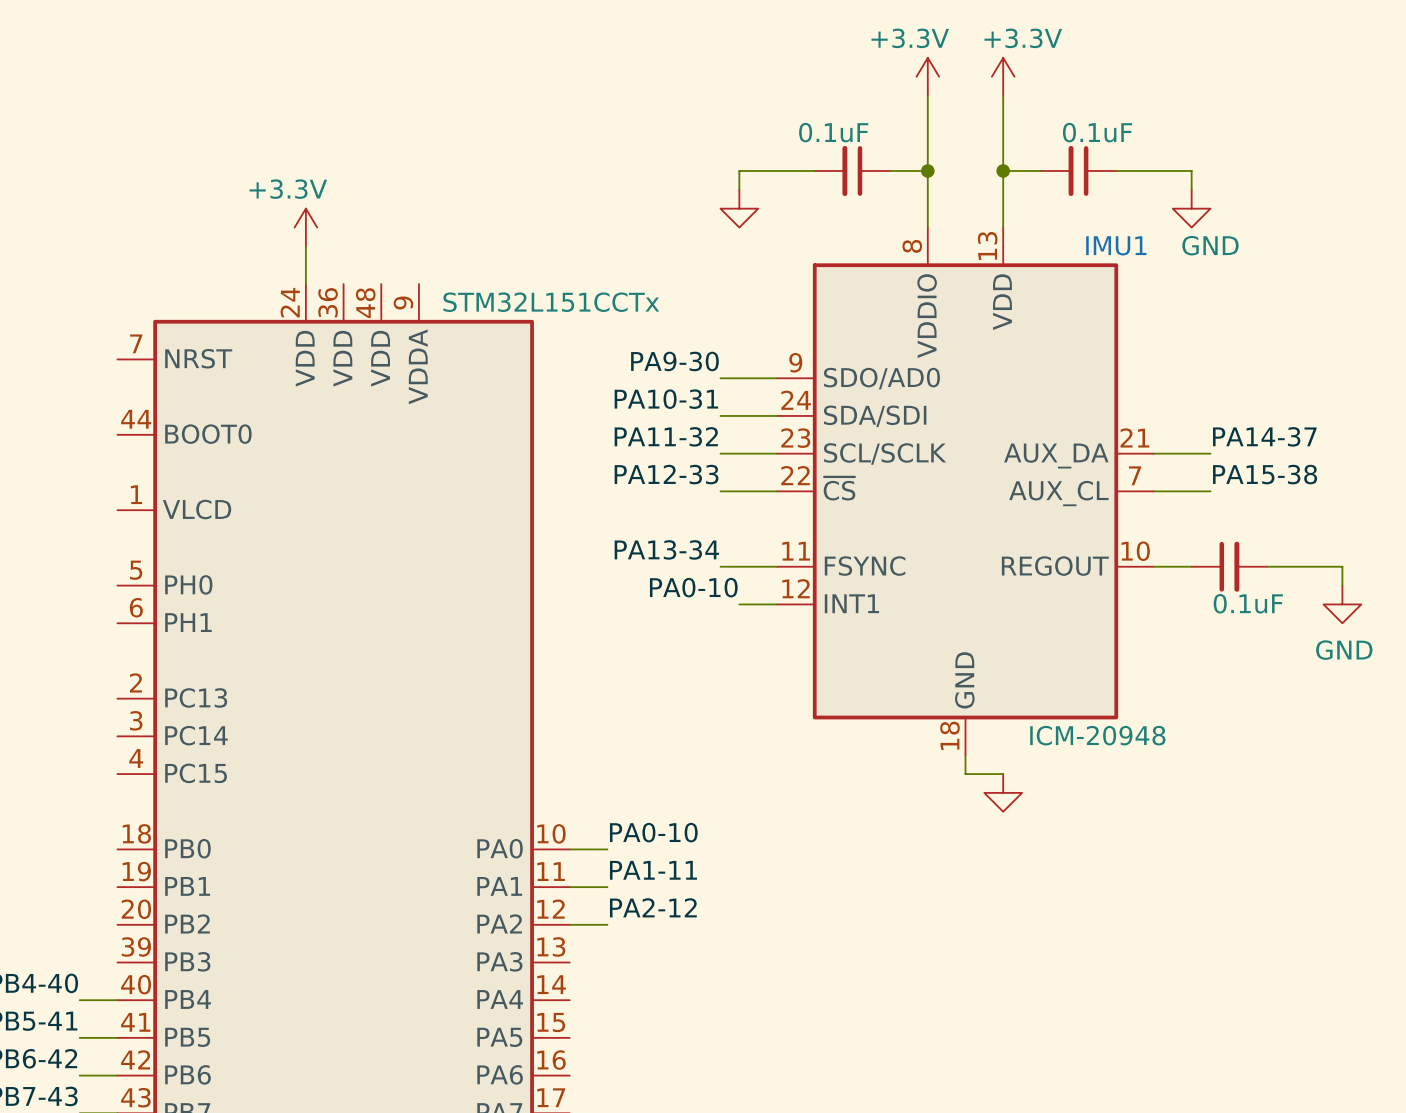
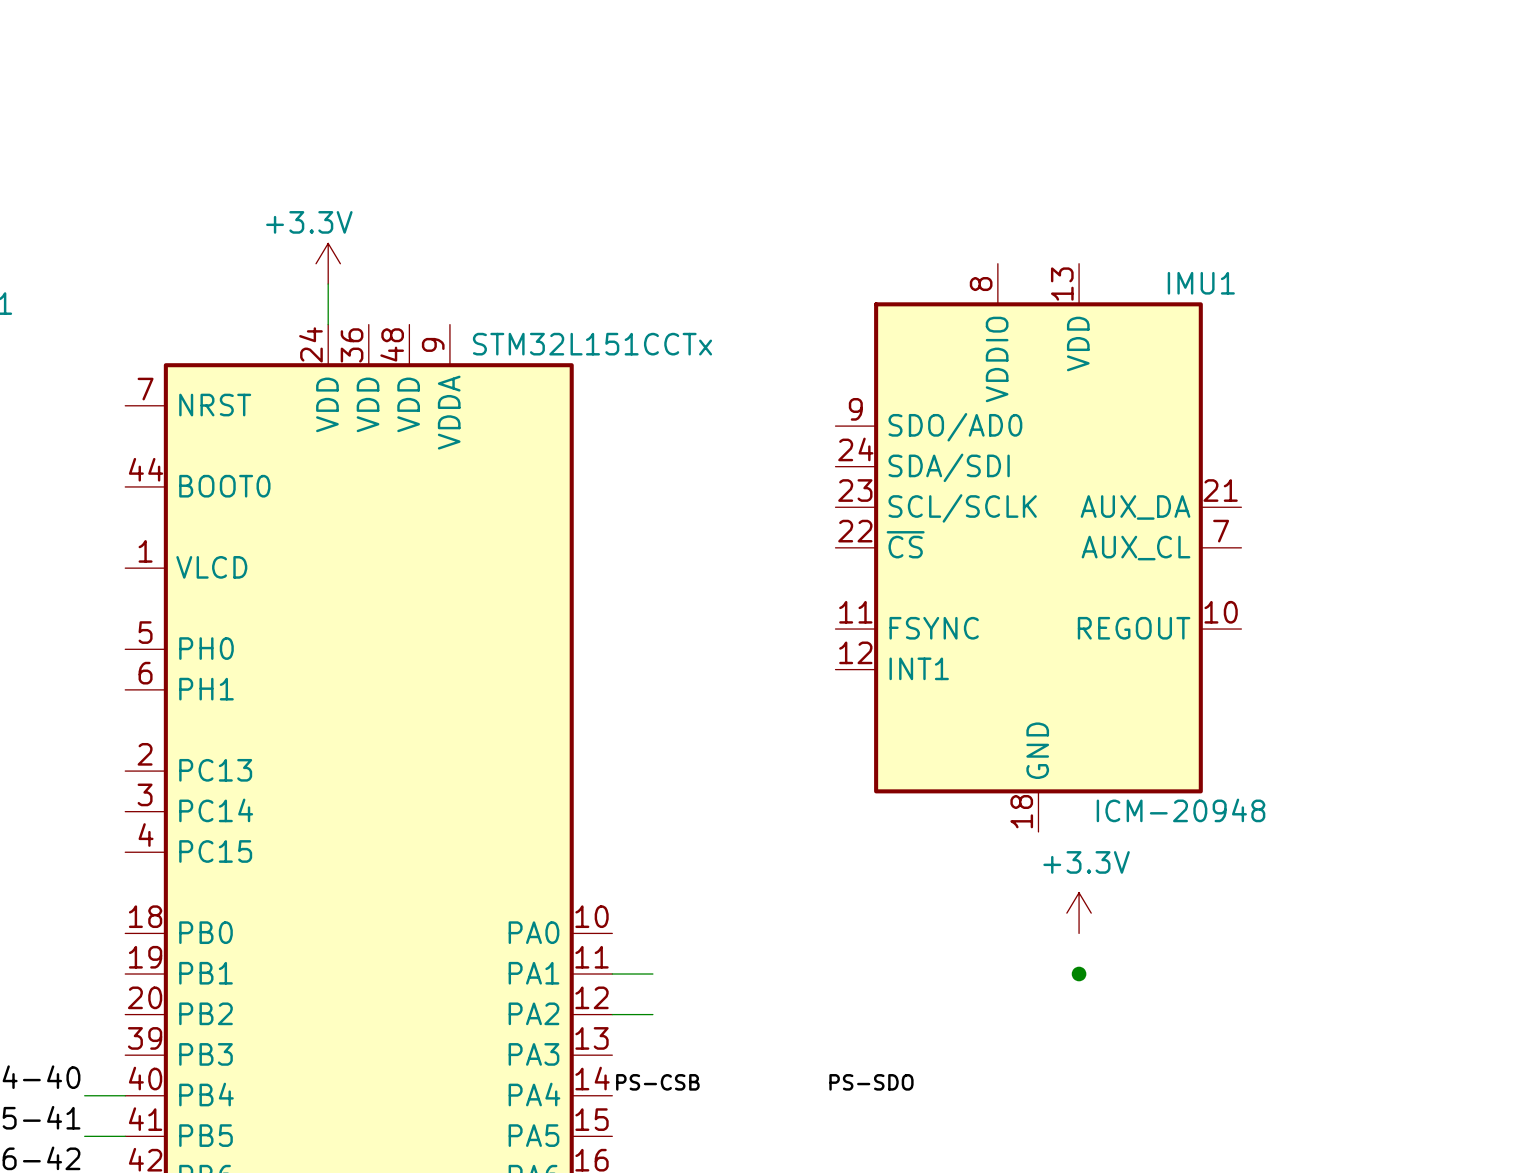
power symbol: +3.3V (927, 76) -> none
power symbol: +3.3V (1003, 76) -> none
wire: (927, 95) (927, 227) -> none
wire: (1003, 95) (1003, 227) -> none
wire: (814, 170) (739, 170) (739, 189) -> none
part: 0.1uF (852, 170) -> none
wire: (890, 170) (927, 170) -> none
junction: (927, 170) -> none
wire: (1003, 170) (1040, 170) -> none
junction: (1003, 170) -> none
part: 0.1uF (1078, 170) -> none
wire: (1116, 170) (1191, 170) (1191, 189) -> none
power symbol: (739, 208) -> none
power symbol: GND (1191, 208) -> none
label: PA9-30 (674, 361) -> none
wire: (720, 378) (777, 378) -> none
label: PA10-31 (666, 399) -> none
wire: (720, 415) (777, 415) -> none
label: PA11-32 (666, 436) -> none
label: PA14-37 (1264, 436) -> none
wire: (720, 453) (777, 453) -> none
wire: (1153, 453) (1210, 453) -> none
label: PA12-33 (666, 474) -> none
label: PA15-38 (1265, 474) -> none
wire: (720, 491) (777, 491) -> none
wire: (1153, 491) (1210, 491) -> none
label: PA13-34 (666, 549) -> none
wire: (720, 566) (777, 566) -> none
wire: (1153, 566) (1191, 566) -> none
part: 0.1uF (1229, 566) -> none
wire: (1267, 566) (1342, 566) (1342, 585) -> none
label: PA0-10 (693, 587) -> none
wire: (739, 604) (777, 604) -> none
power symbol: GND (1342, 604) -> none
wire: (965, 755) (965, 774) (1003, 774) -> none
power symbol: (1003, 792) -> none
power symbol: none -> +3.3V (1079, 913)
label: PA0-10 (653, 832) -> none
wire: (569, 849) (607, 849) -> none
label: PA1-11 (653, 870) -> none
junction: none -> (1079, 974)
label: PA2-12 (653, 907) -> none
label: none -> PS-CSB (657, 1082)
label: none -> PS-SDO (871, 1082)

